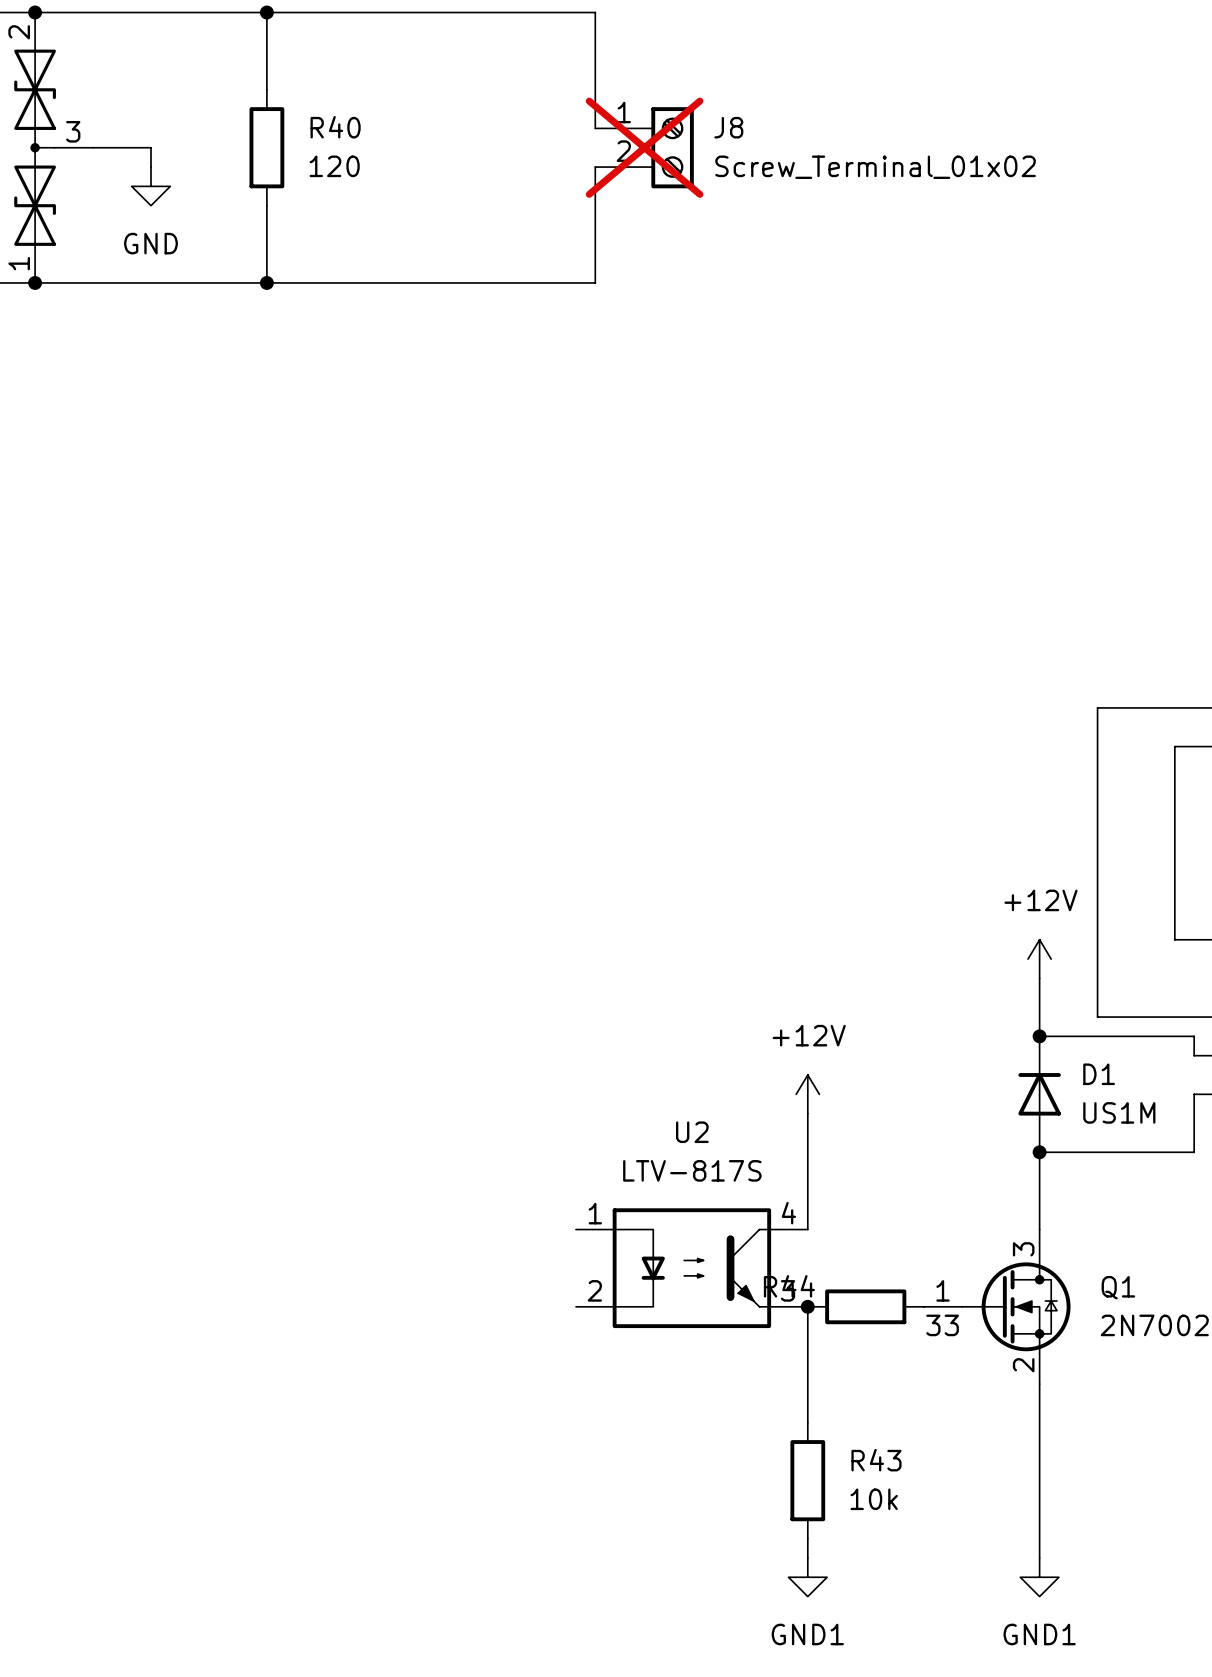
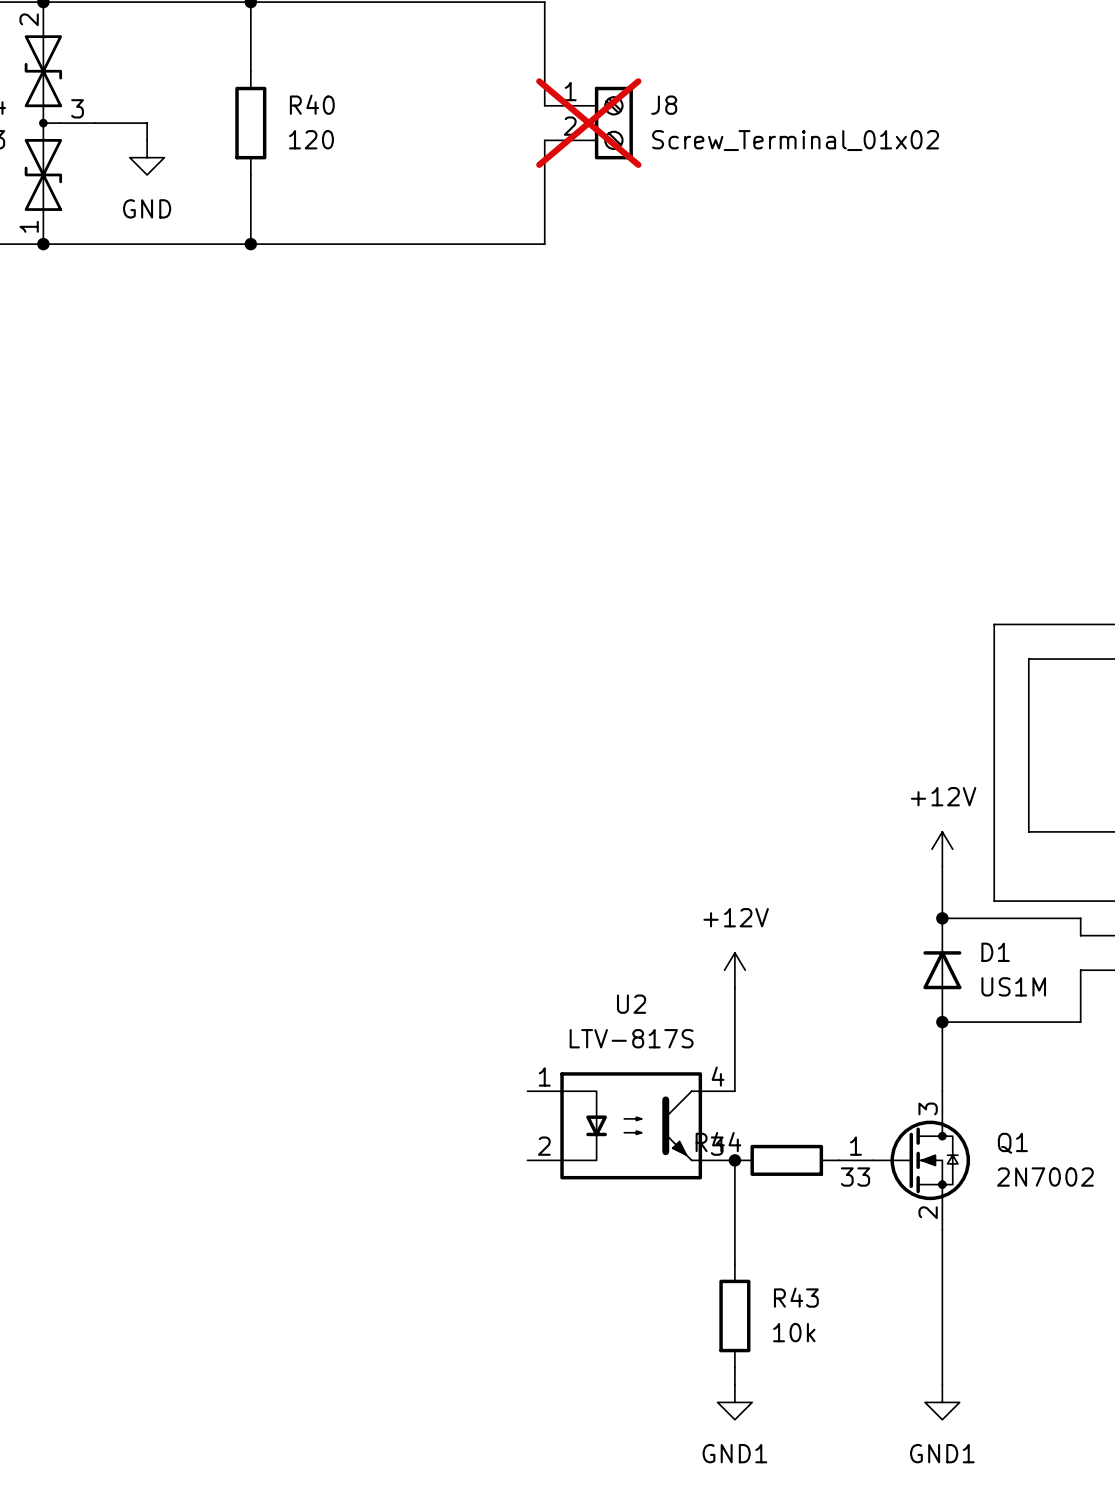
wire: (1174, 746) (1174, 939) -> (1063, 659) (1028, 659) (1028, 831) (1063, 831)

